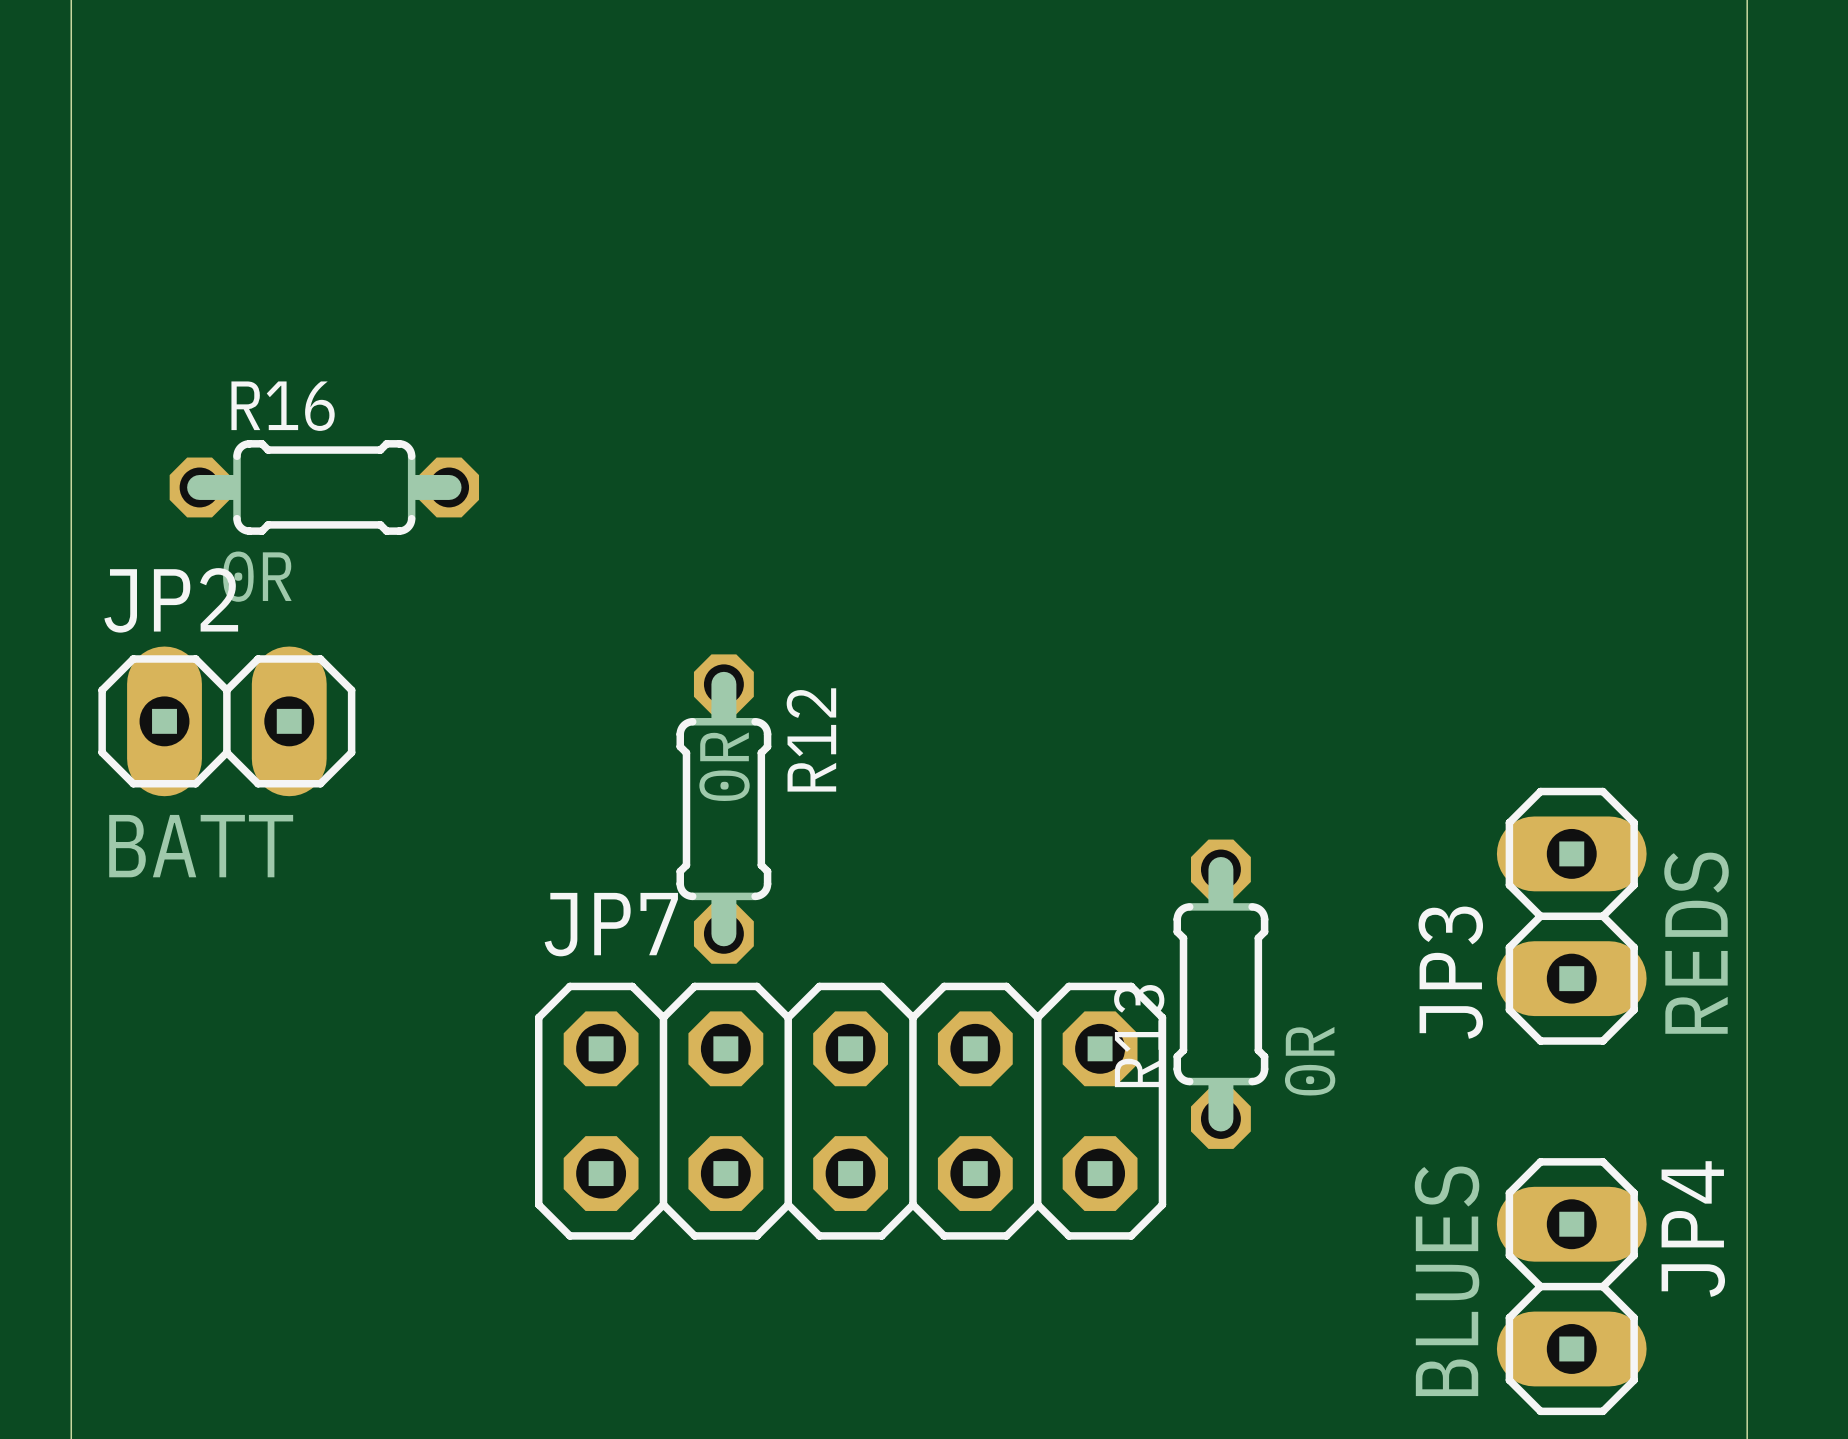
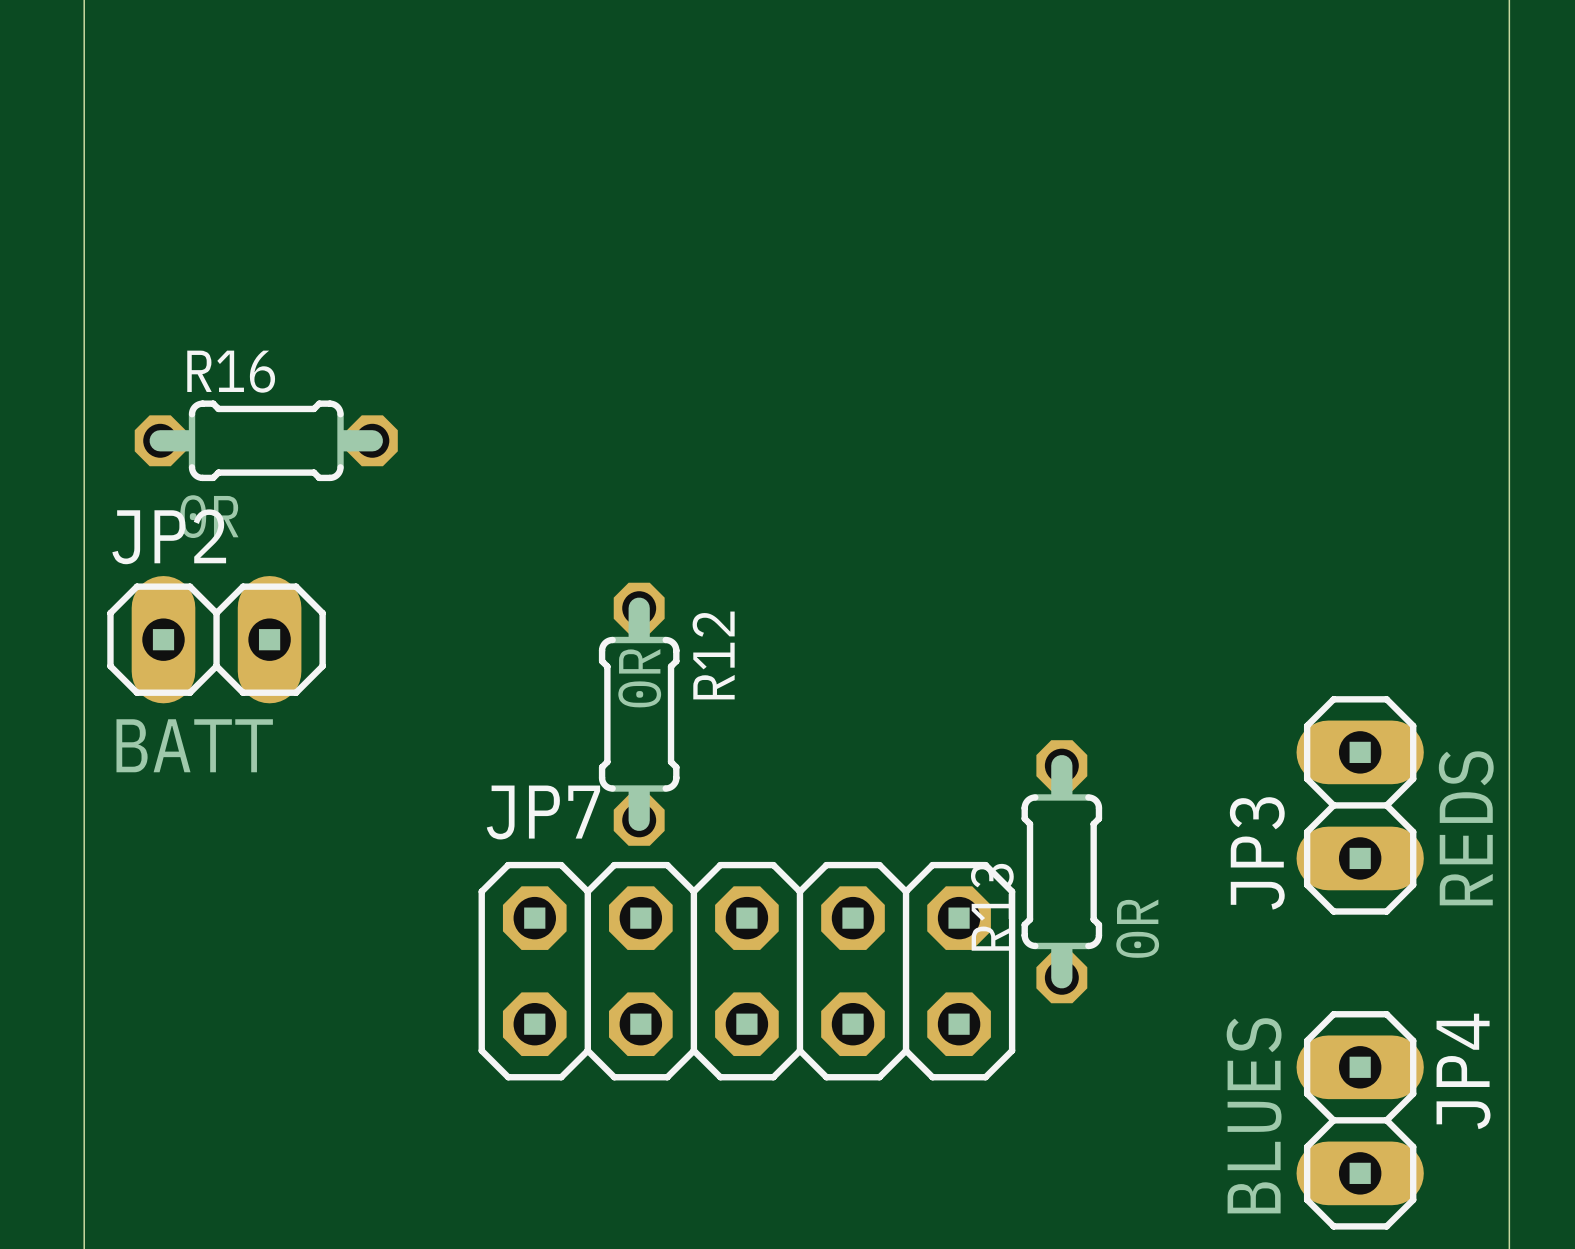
R16 position: (324, 487) -> (266, 440)

